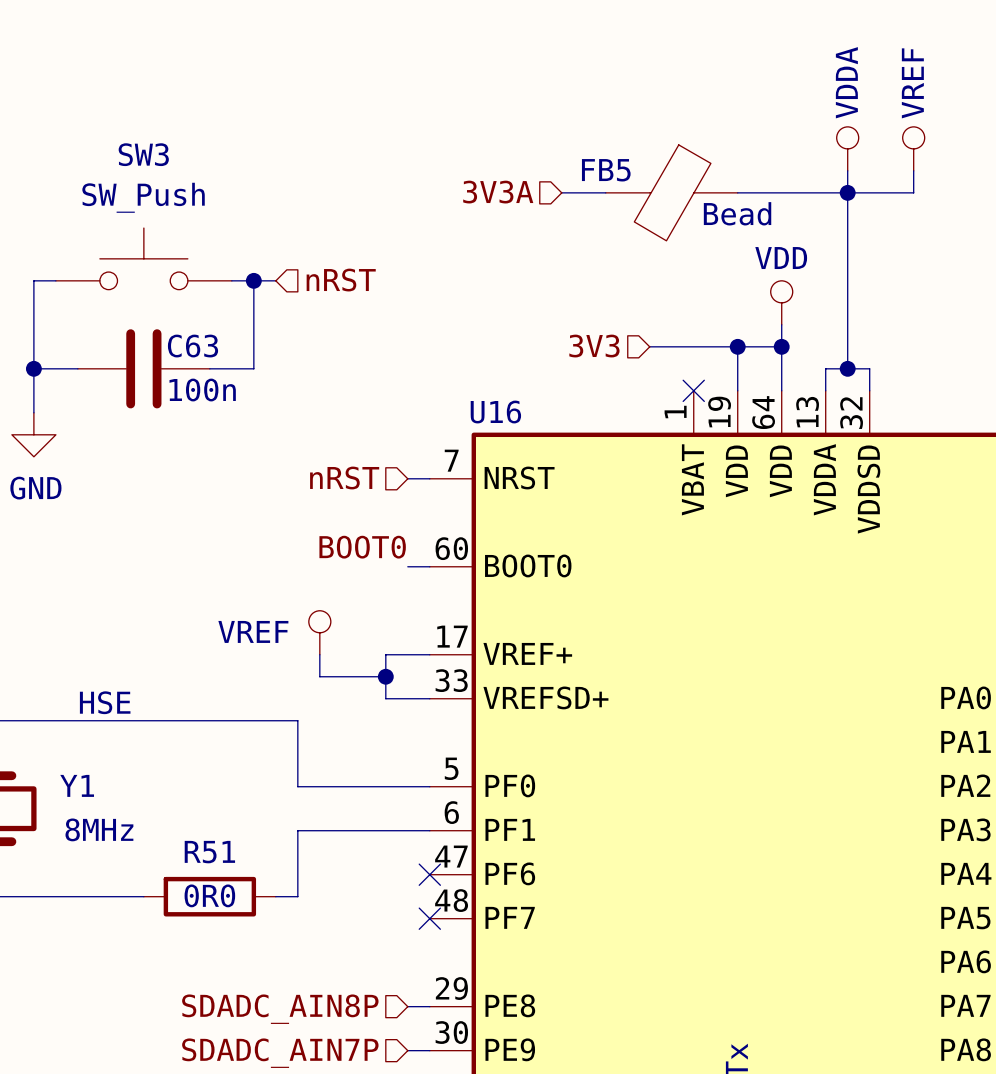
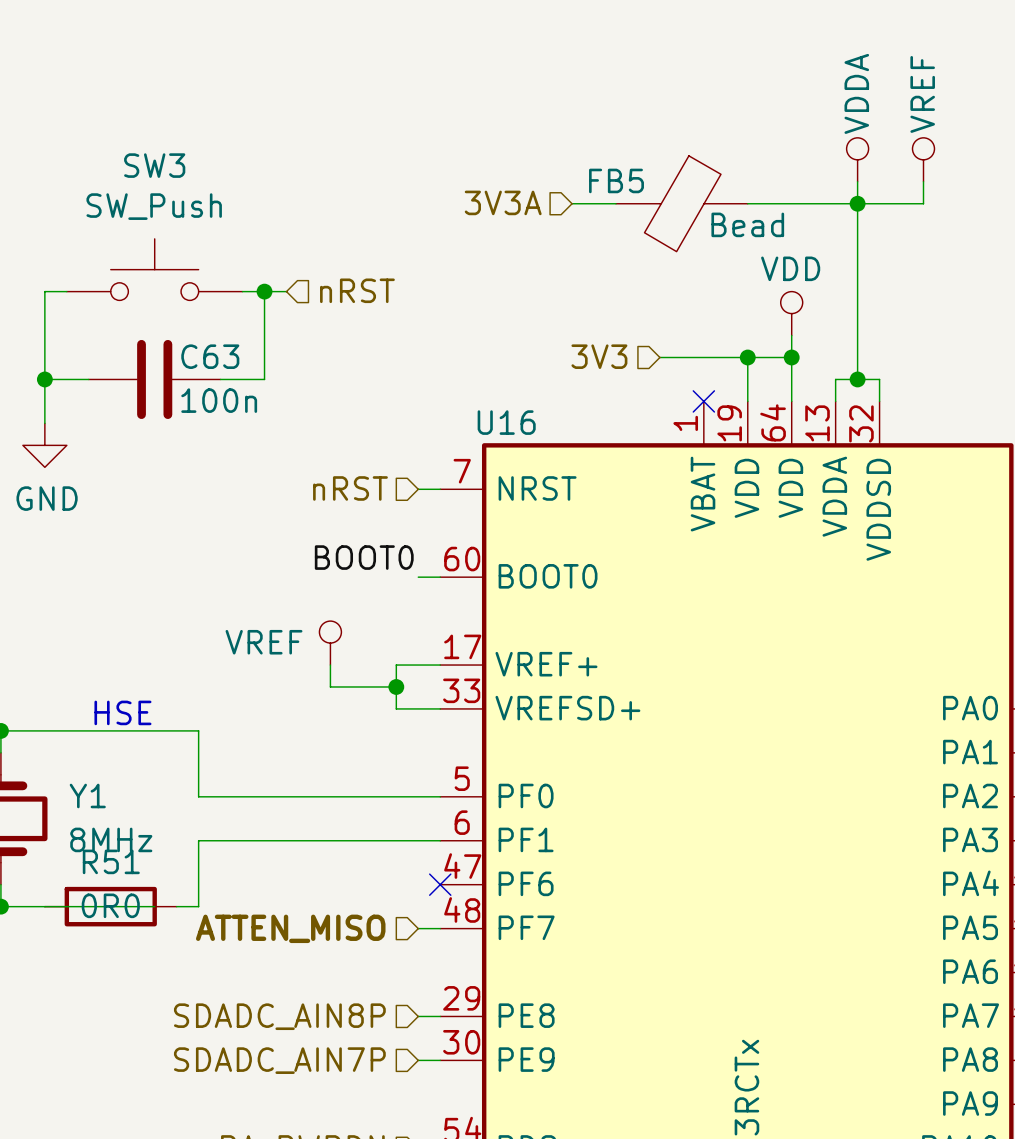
wire: (187, 720) (297, 720) (297, 786) -> (198, 730) (198, 796) (308, 796)
wire: (297, 830) (297, 896) (275, 896) -> (308, 840) (198, 840) (198, 906) (176, 906)
R51 position: (209, 896) -> (110, 906)
wire: none -> (418, 928) (440, 928)
no-connect mark: (429, 918) -> none
hierarchical label: none -> ATTEN_MISO (290, 928)

